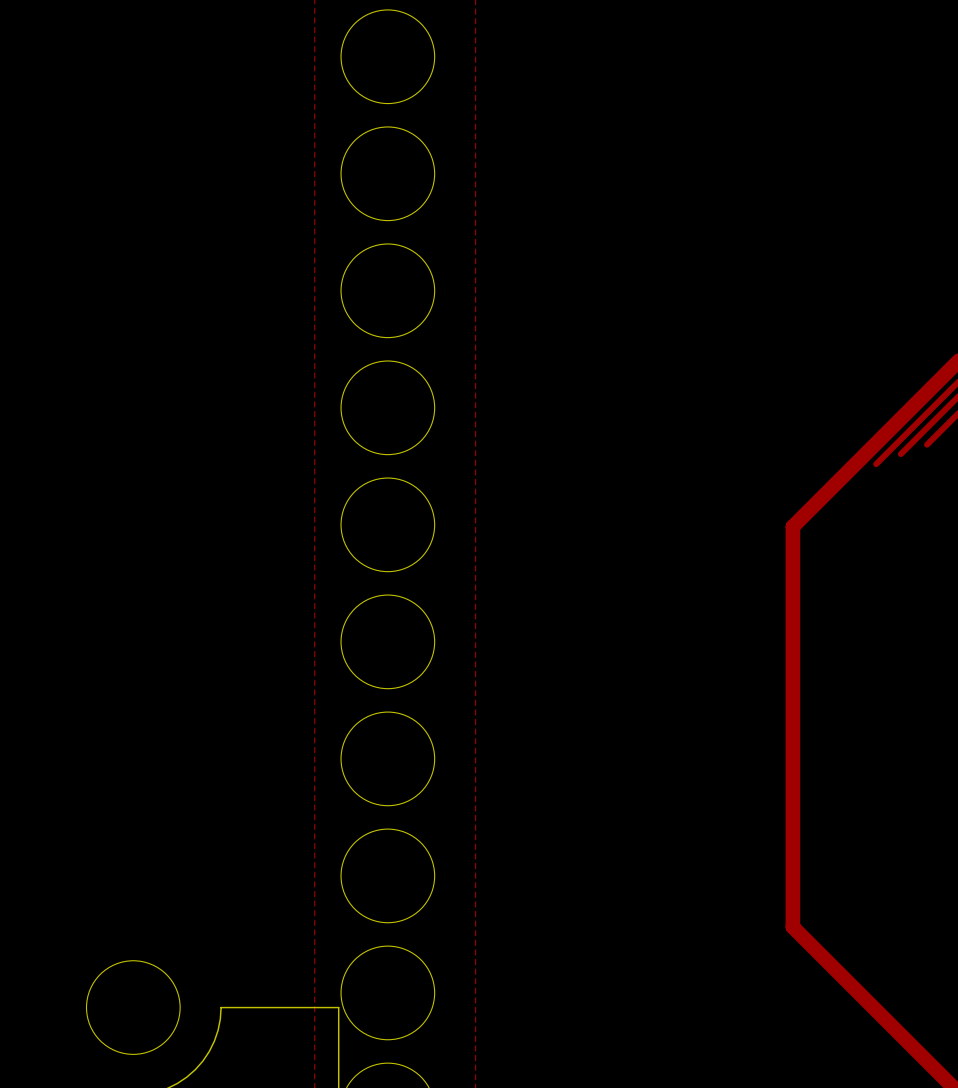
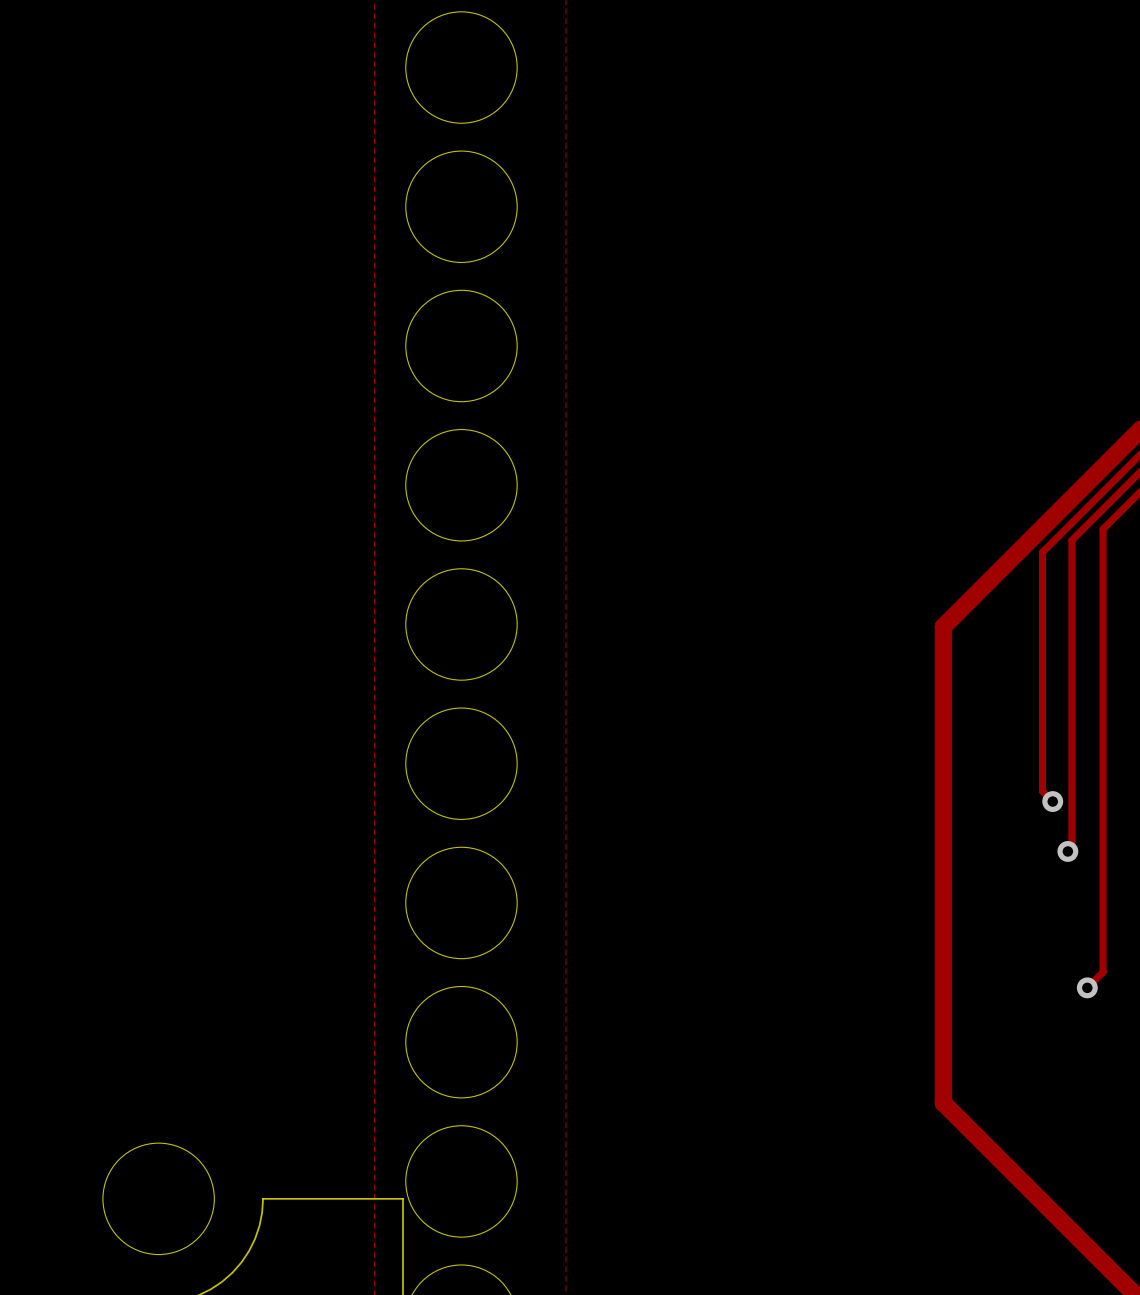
track: none -> (1103, 529) (1103, 972) (1087, 987)
track: none -> (1071, 540) (1071, 847) (1067, 851)
track: none -> (1042, 552) (1042, 791) (1052, 801)
via: none -> (1052, 801)
via: none -> (1067, 851)
via: none -> (1087, 987)

